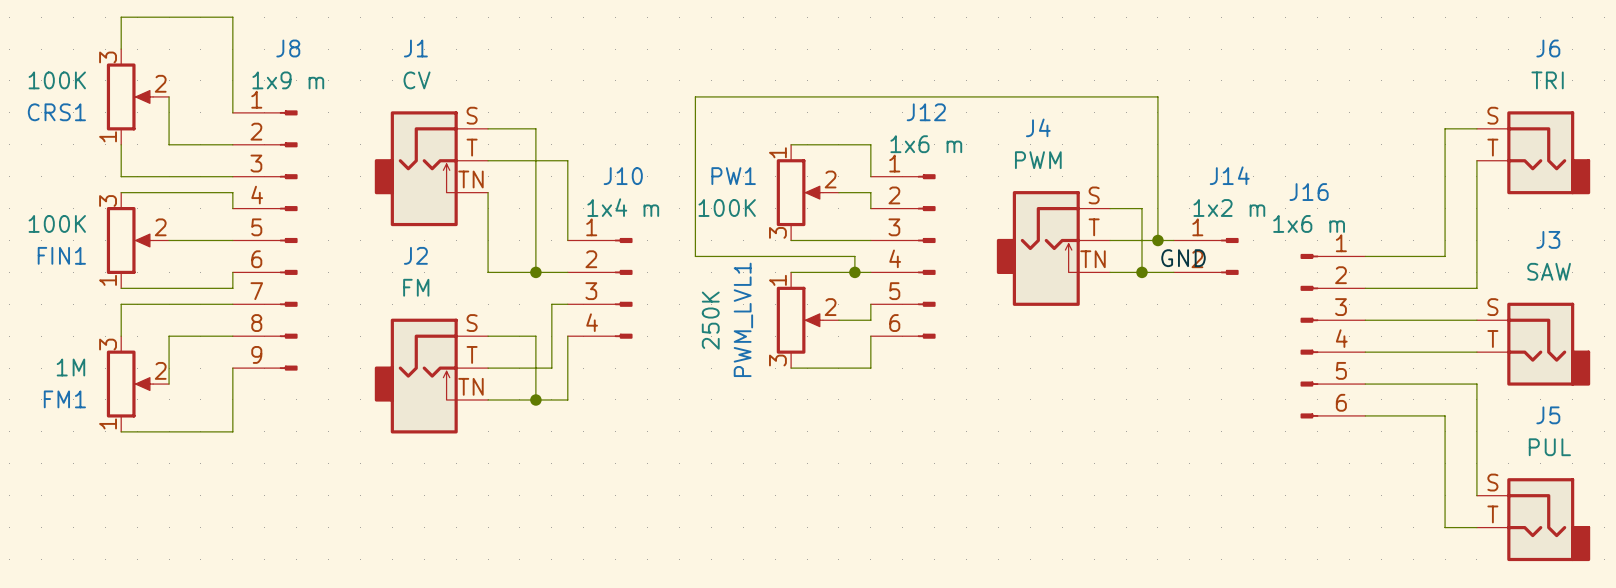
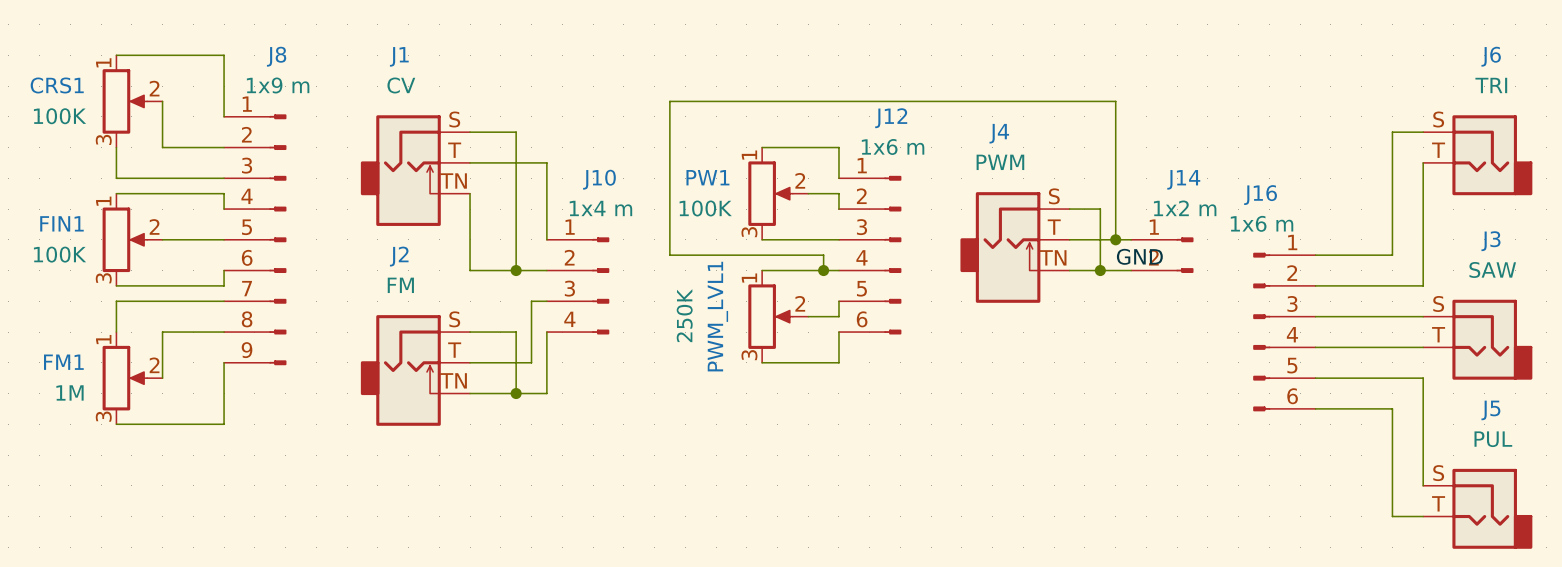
wire: (121, 49) (121, 17) (232, 17) (232, 49) -> (116, 55) (224, 55)
CRS1 flip: as is (129, 96) -> up-down (124, 101)
FIN1 flip: as is (129, 240) -> up-down (124, 239)
FM1 flip: as is (129, 384) -> up-down (124, 378)

